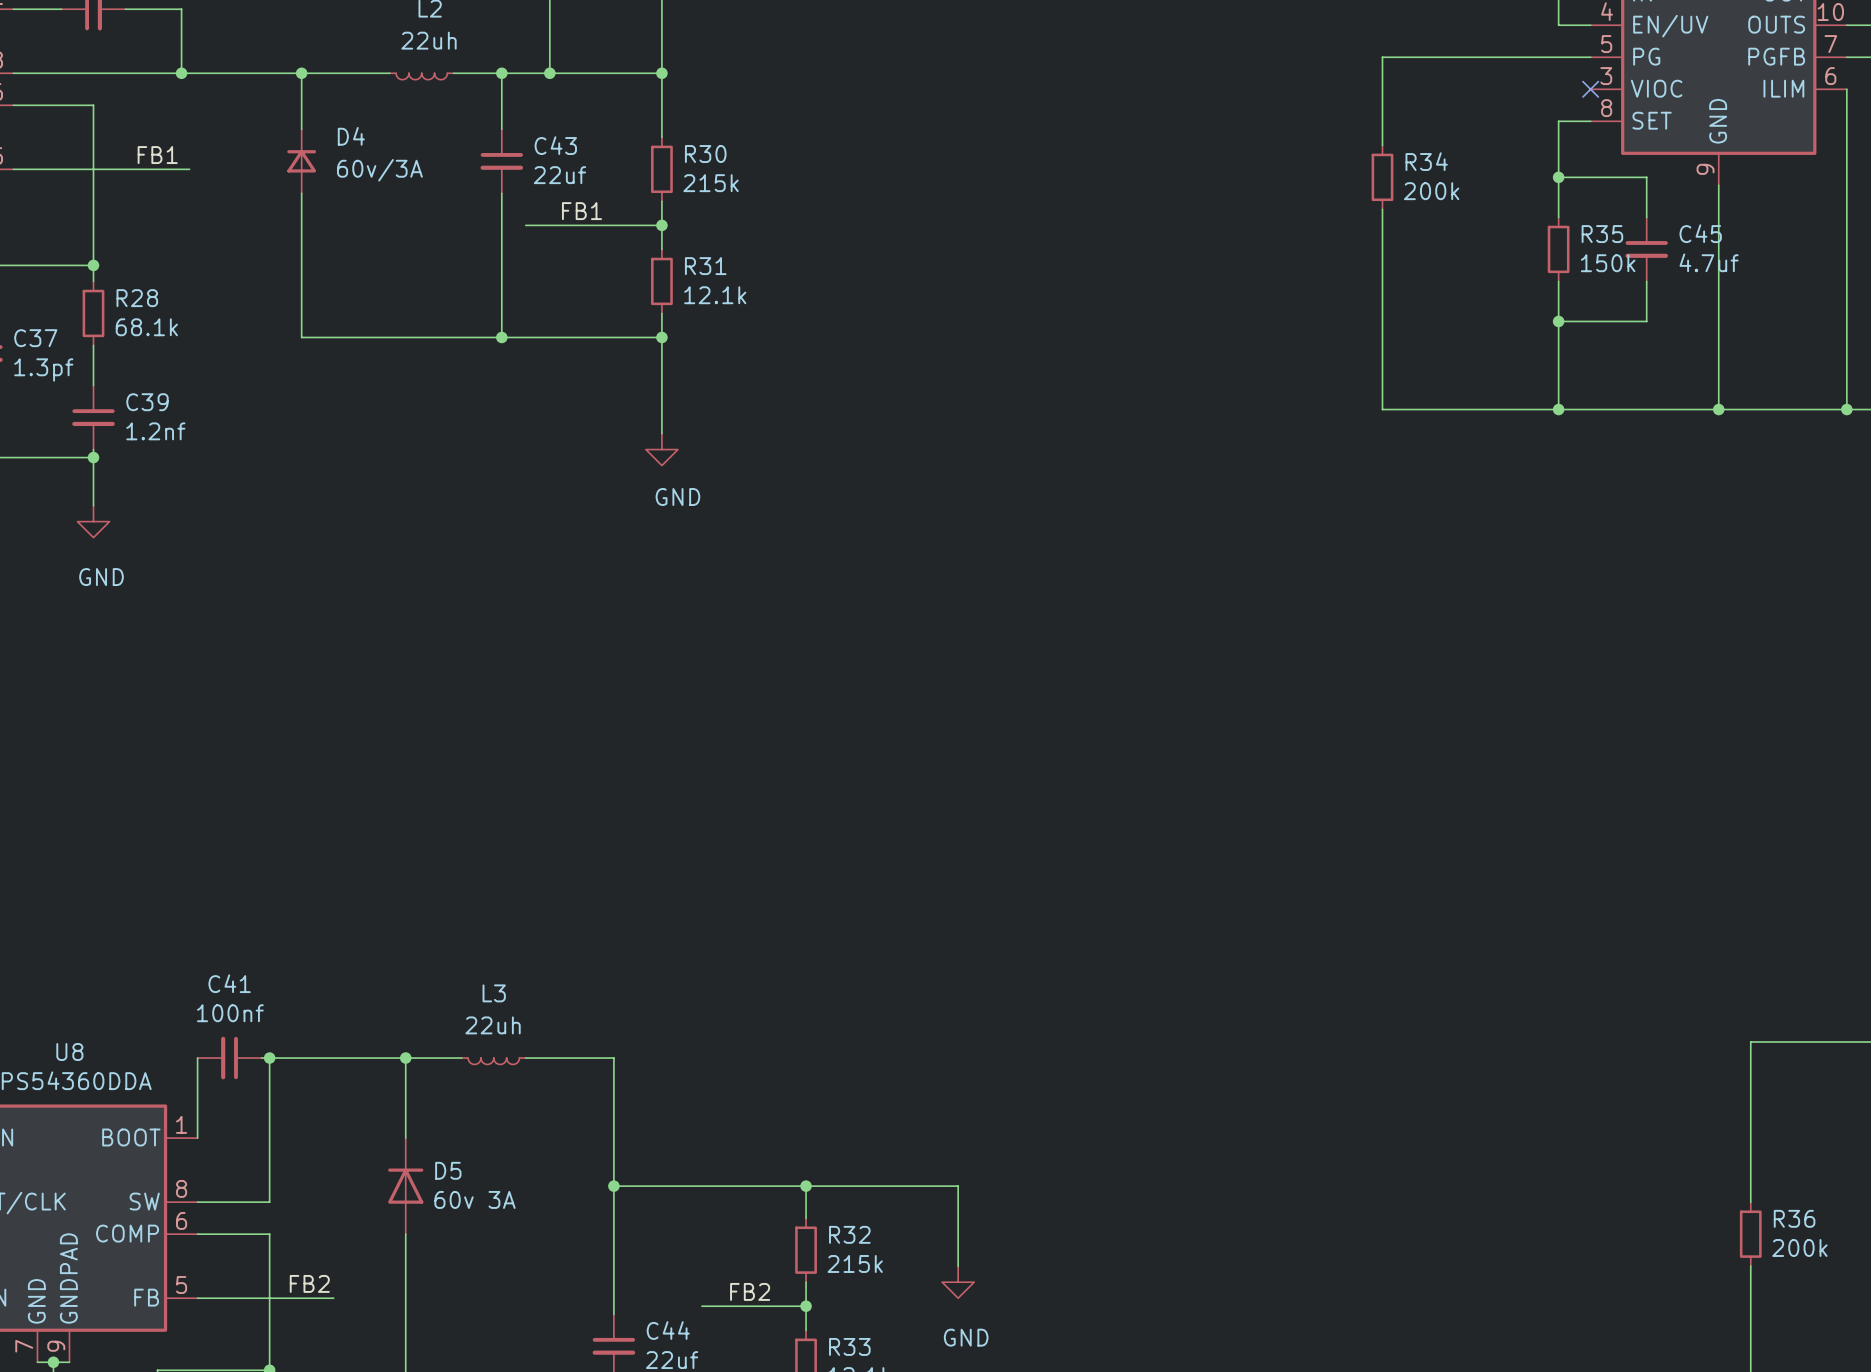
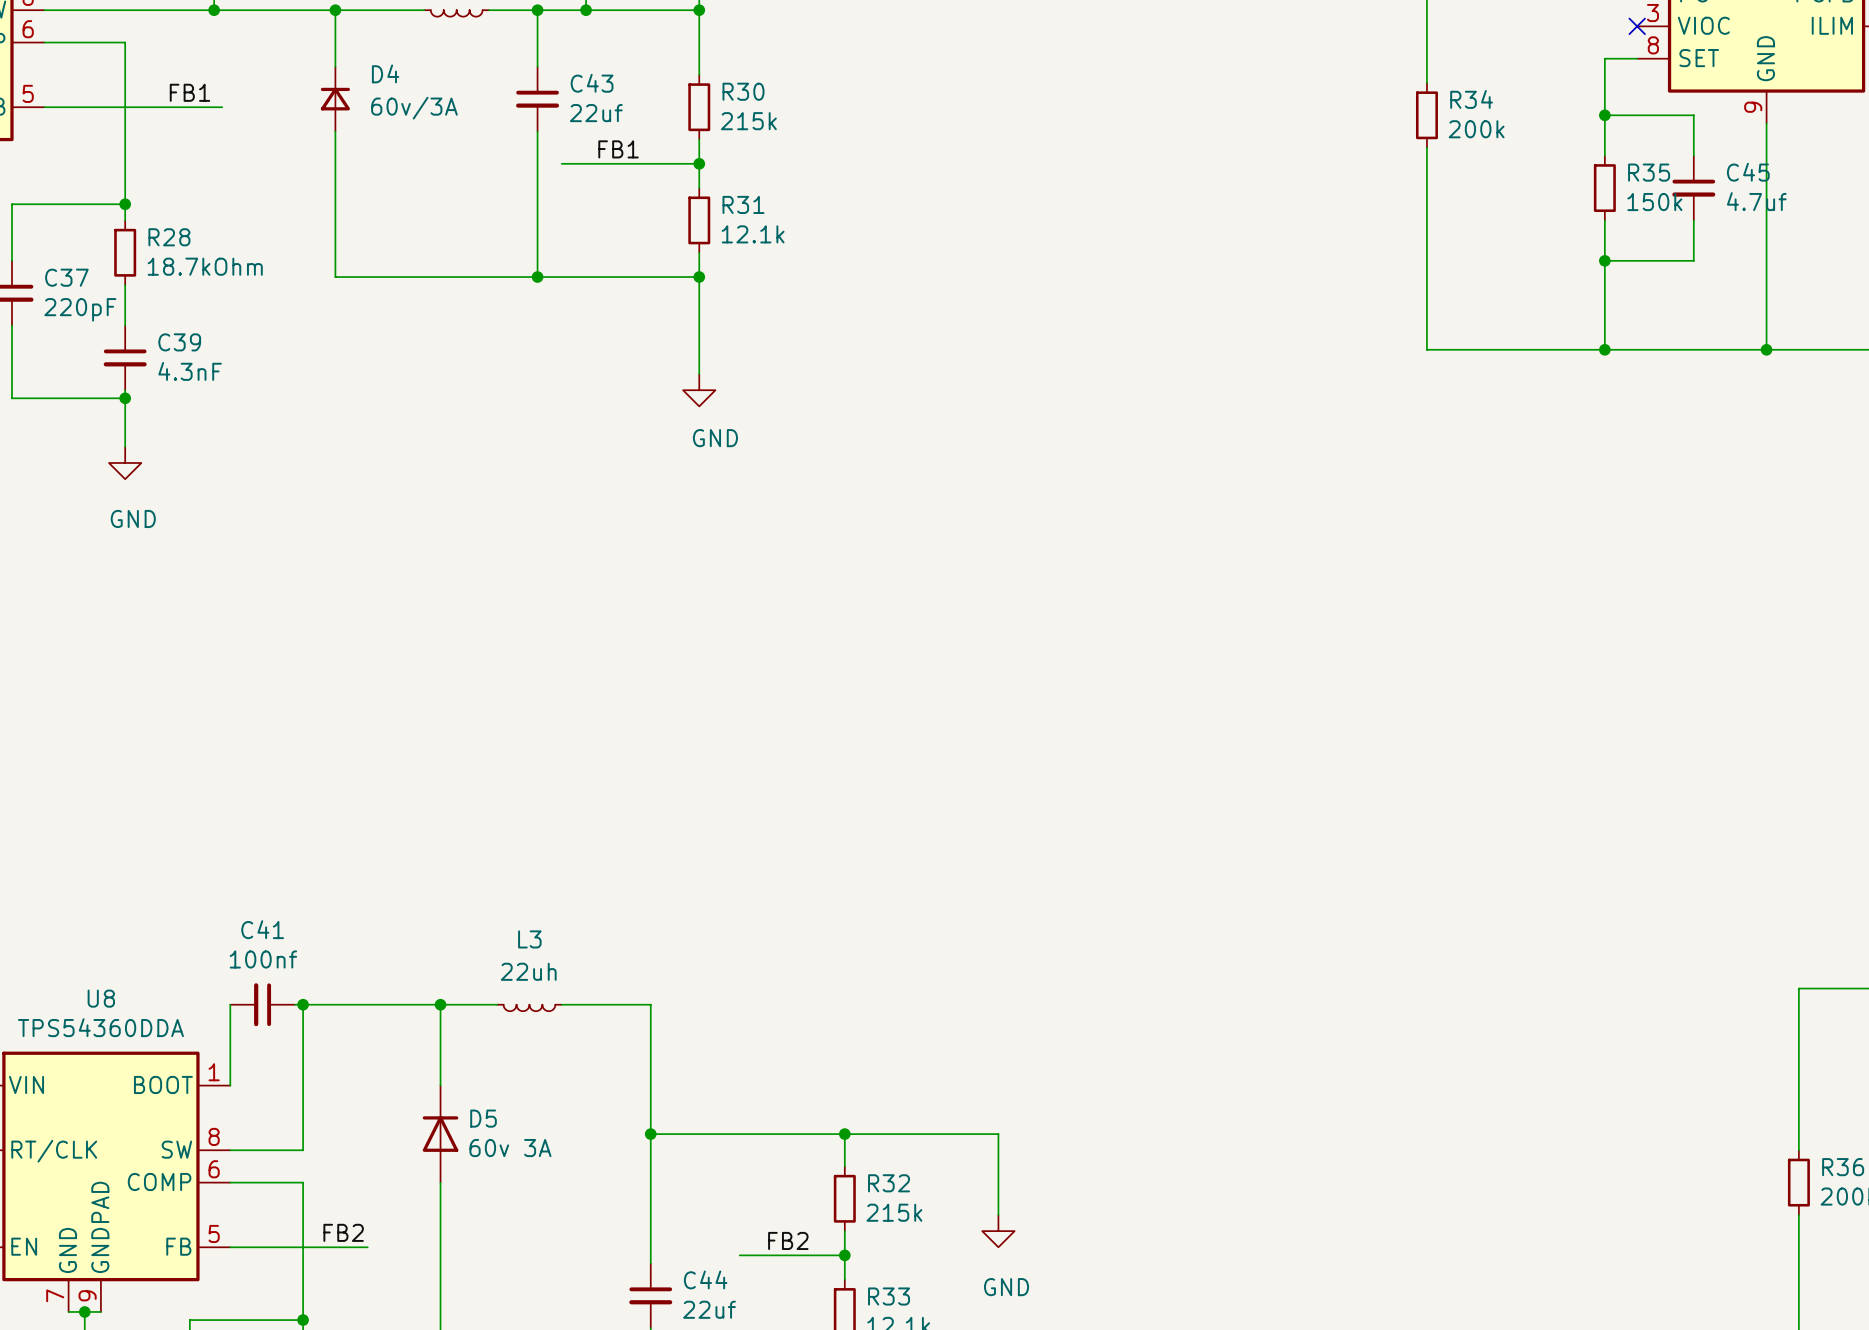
R28 value: 68.1k (146, 327) -> 18.7kOhm (205, 266)
C37 value: 1.3pf (43, 369) -> 220pF (80, 309)
C39 value: 1.2nf (155, 431) -> 4.3nF (190, 371)

